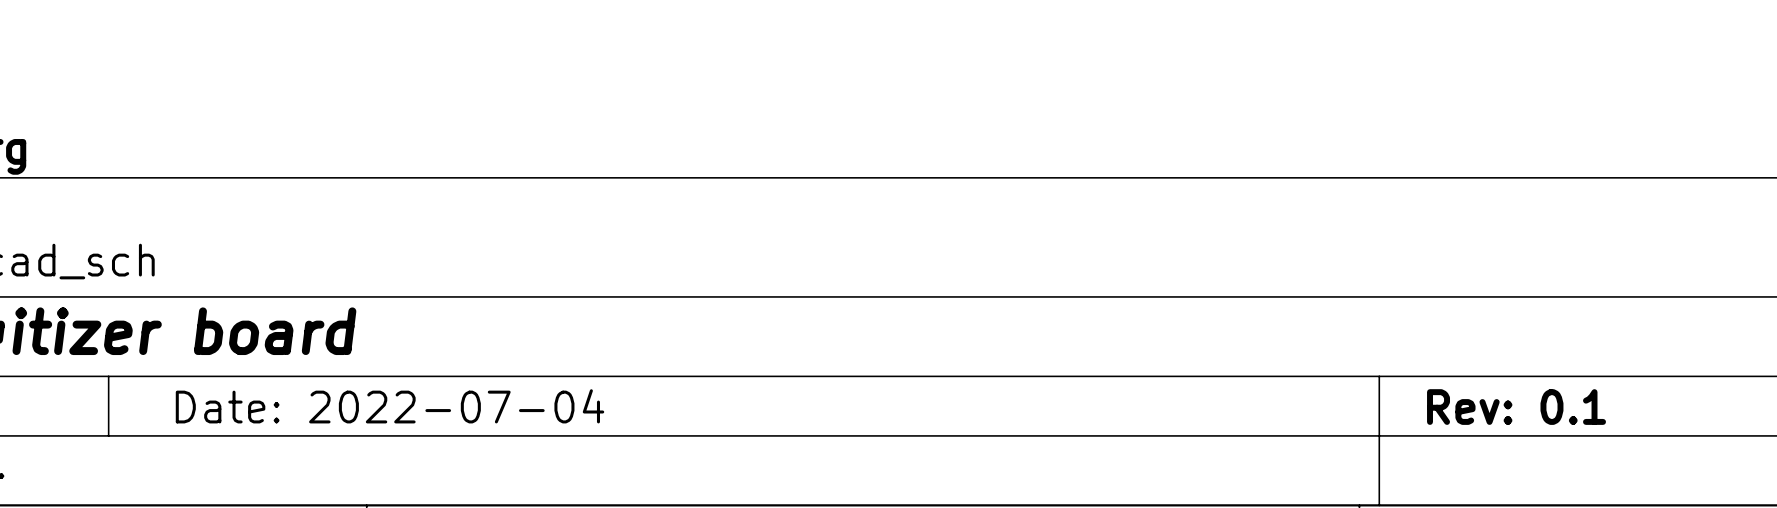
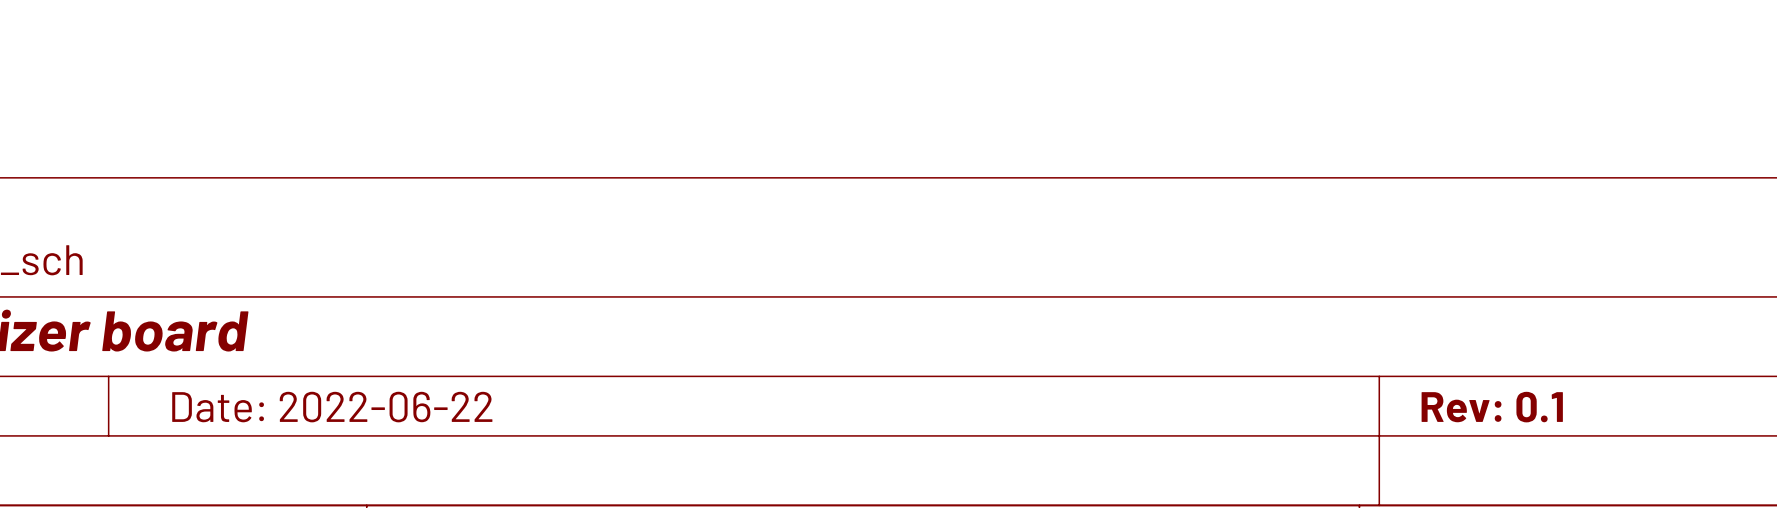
title block: Date: 2022-07-04 (390, 406) -> Date: 2022-06-22 (332, 407)

